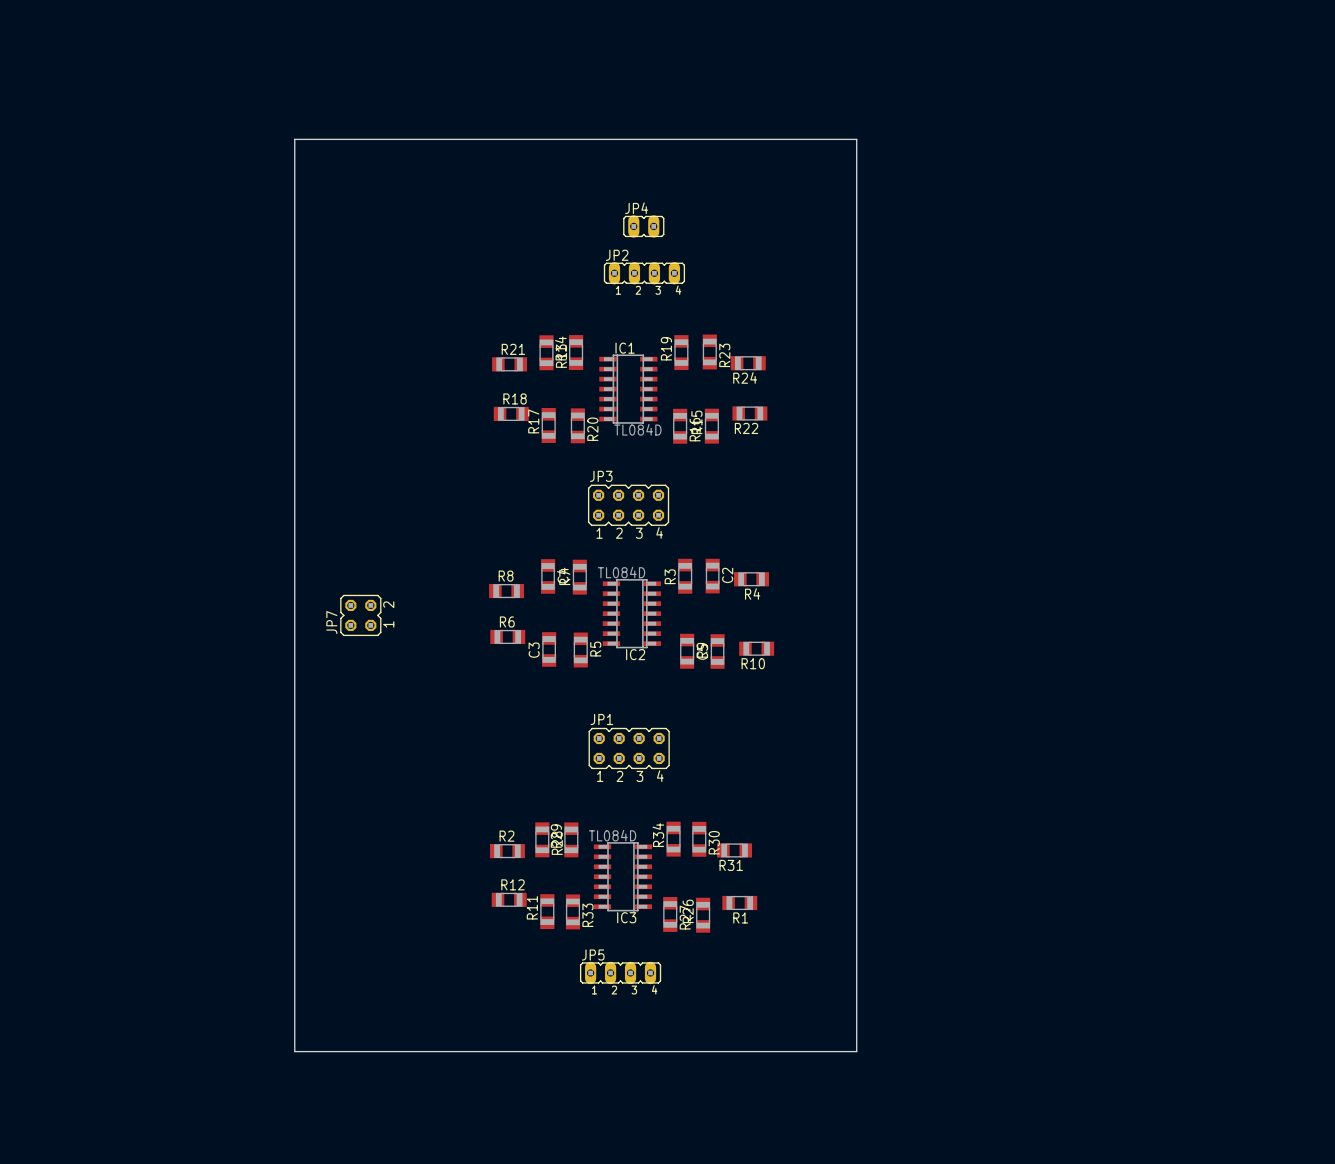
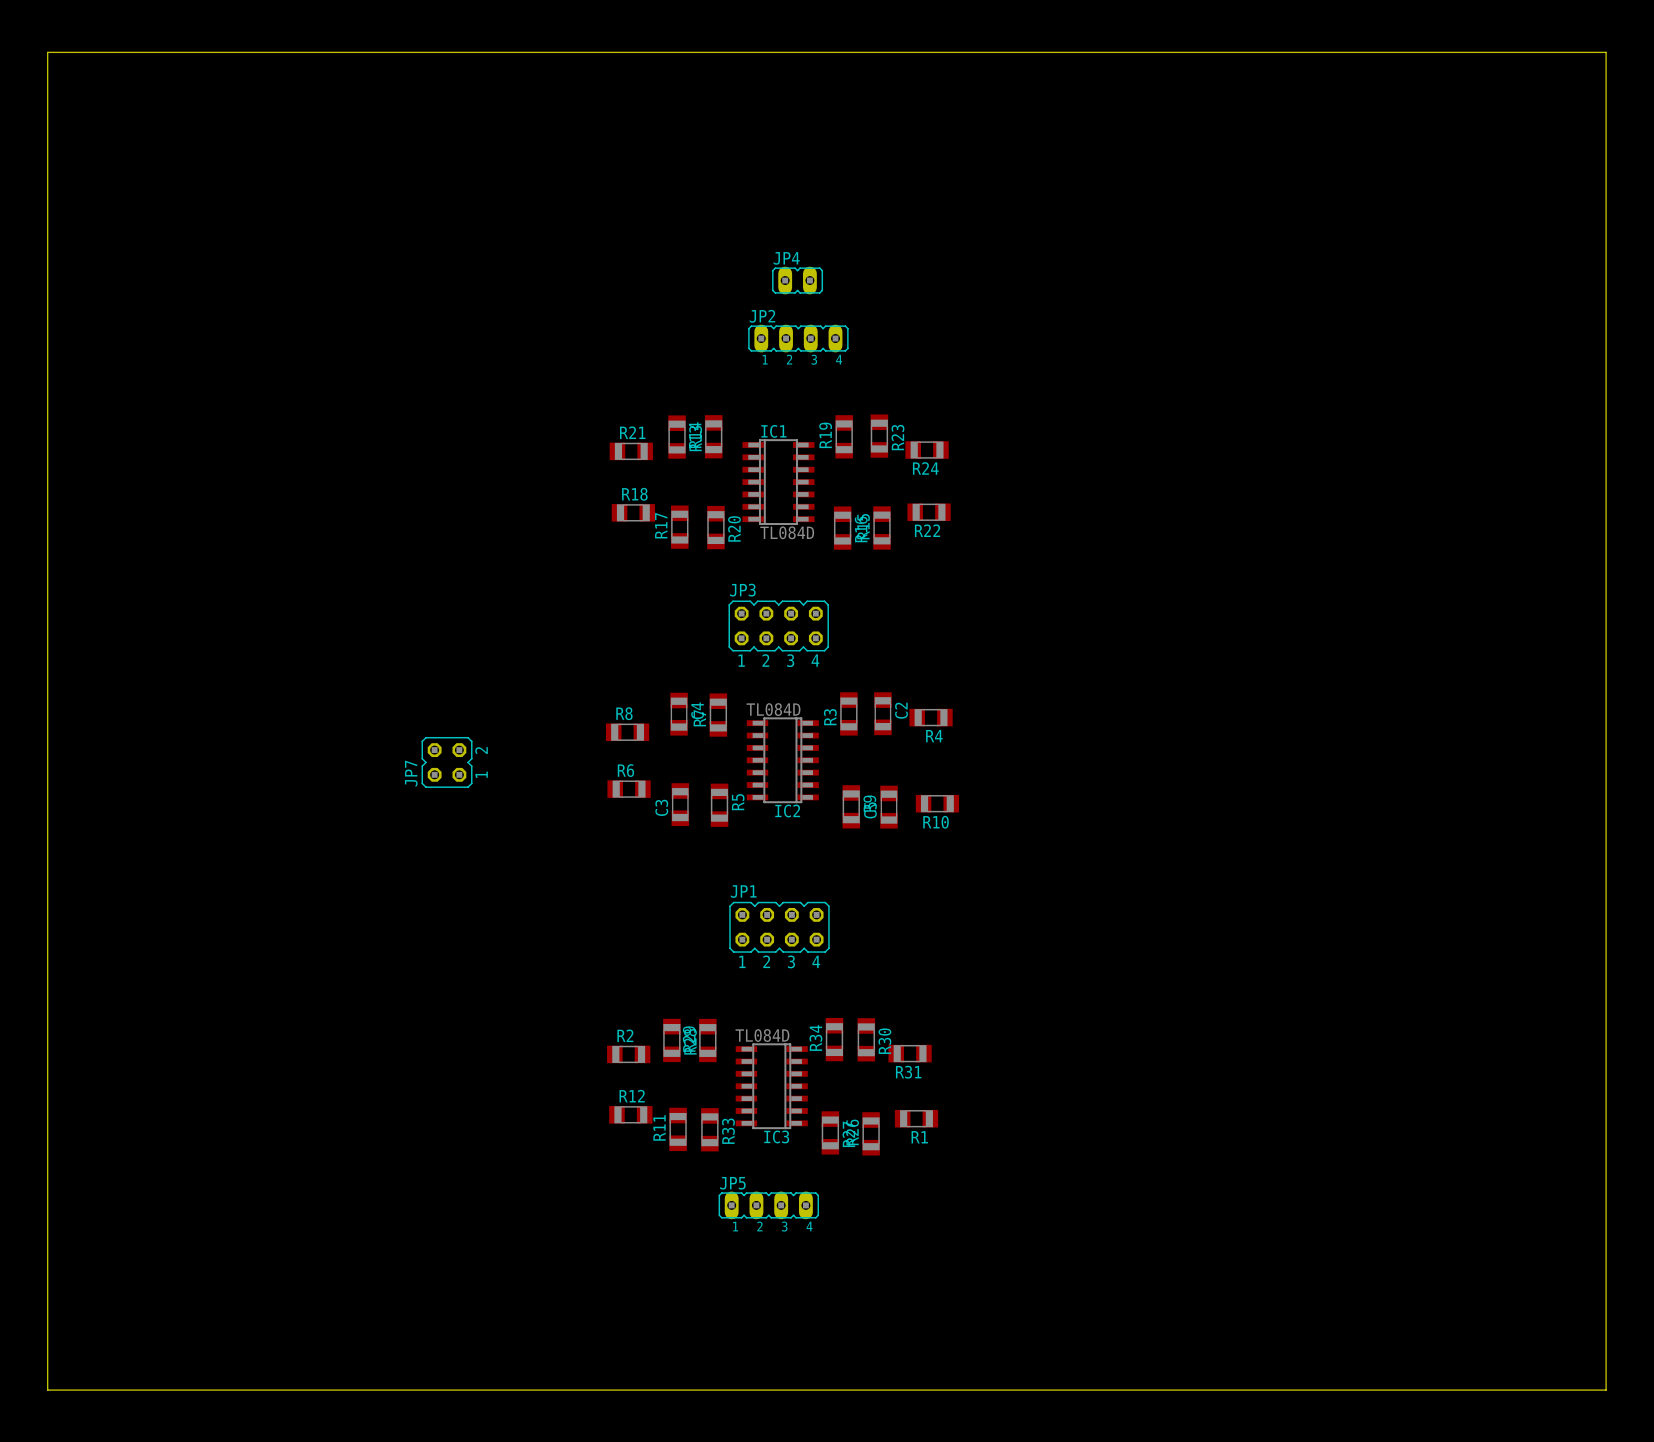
board edge: none -> (47, 52) (1606, 52) (1606, 1390) (47, 1390) (47, 52)
board edge: (294, 139) (856, 139) (856, 1051) (294, 1051) (294, 139) -> none

